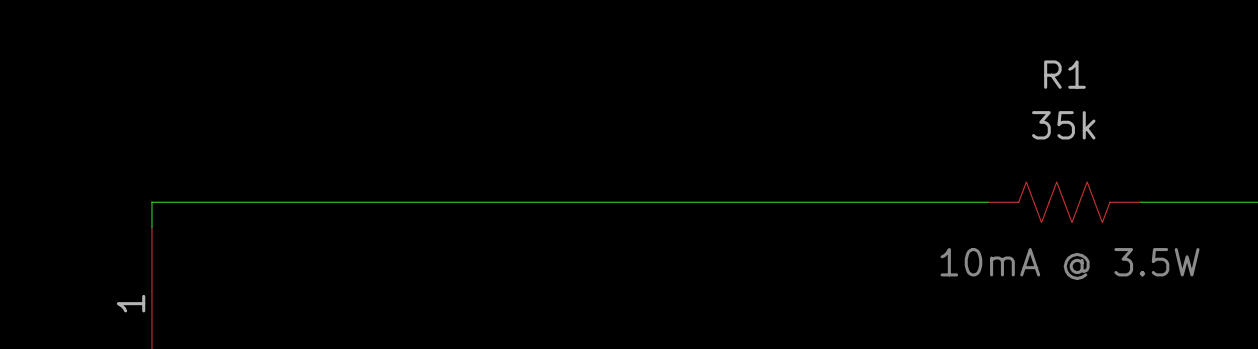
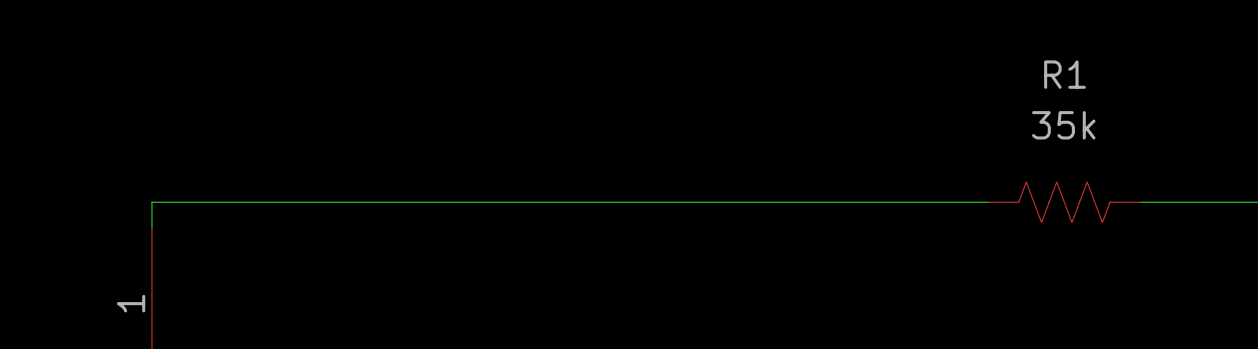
text: 10mA @ 3.5W (1070, 264) -> none

